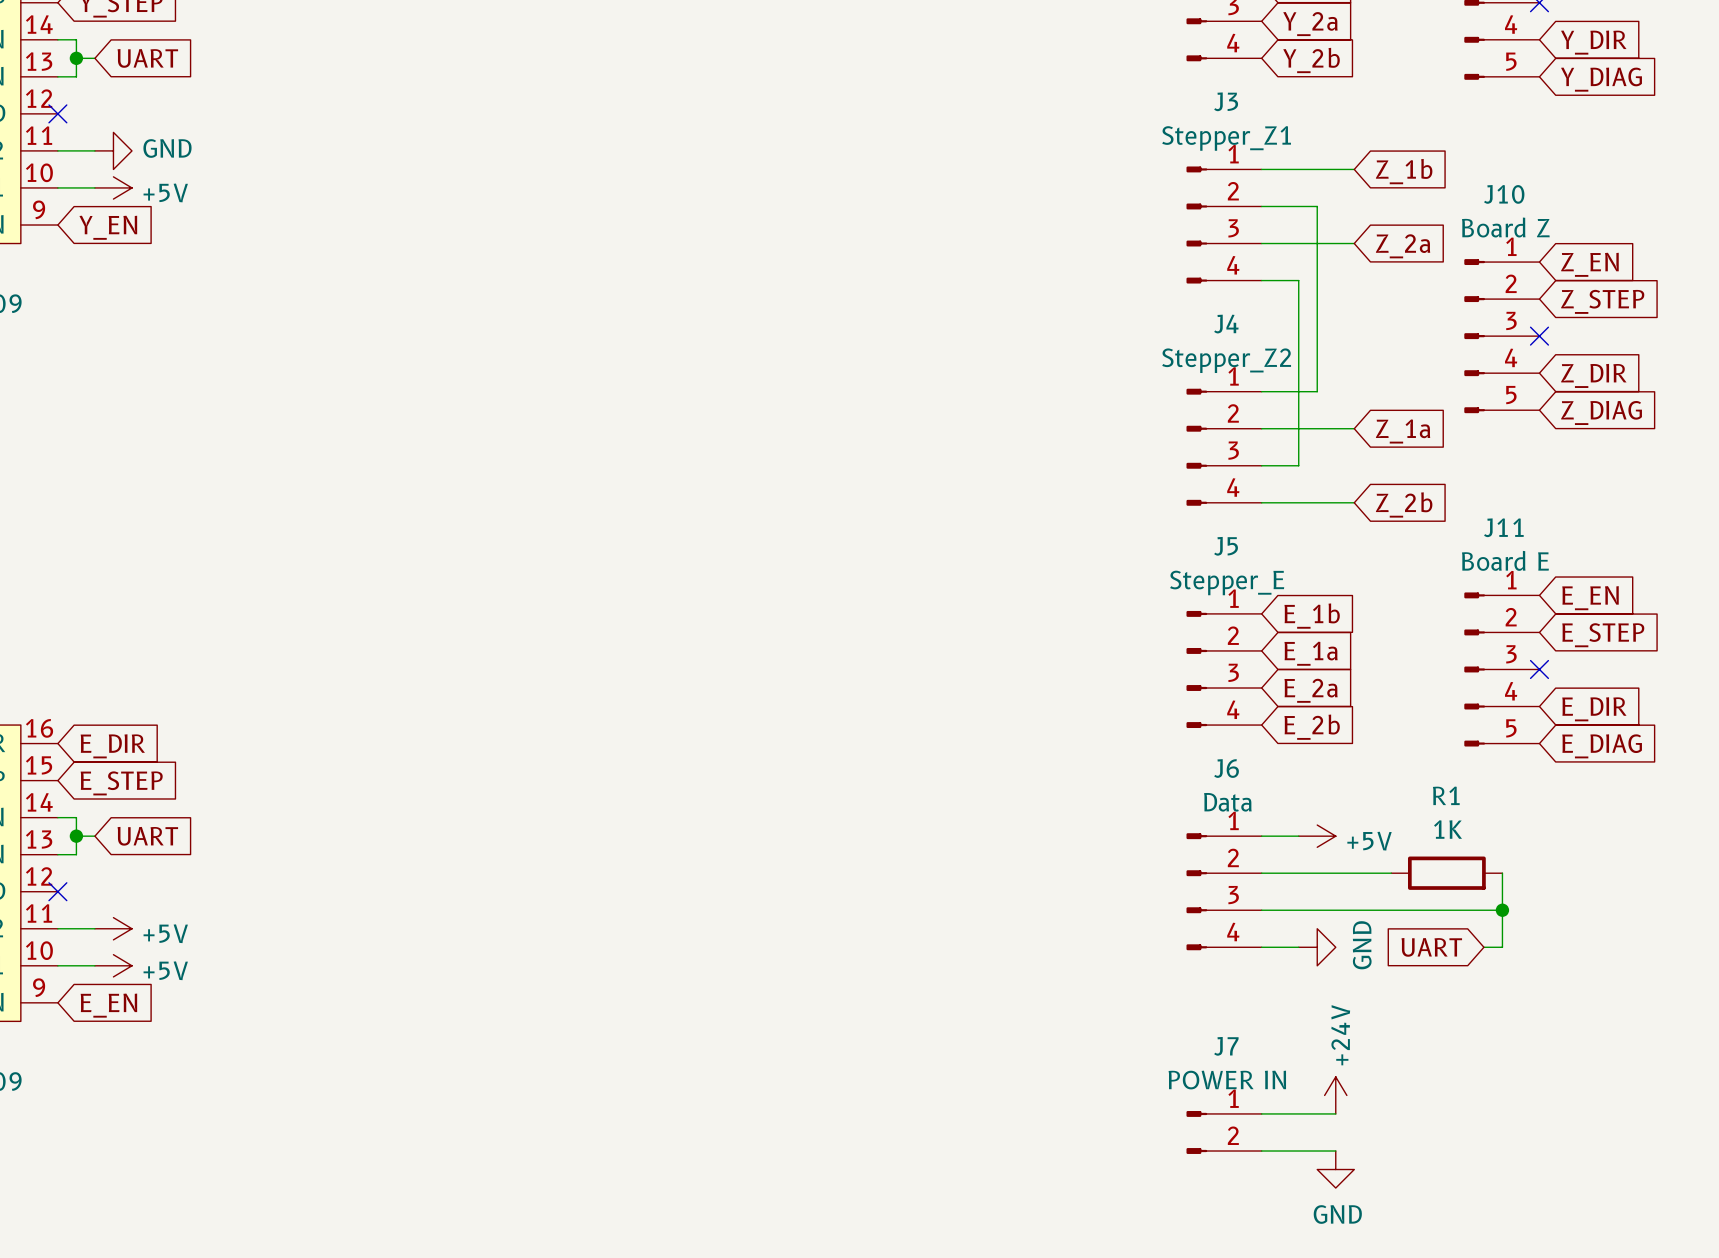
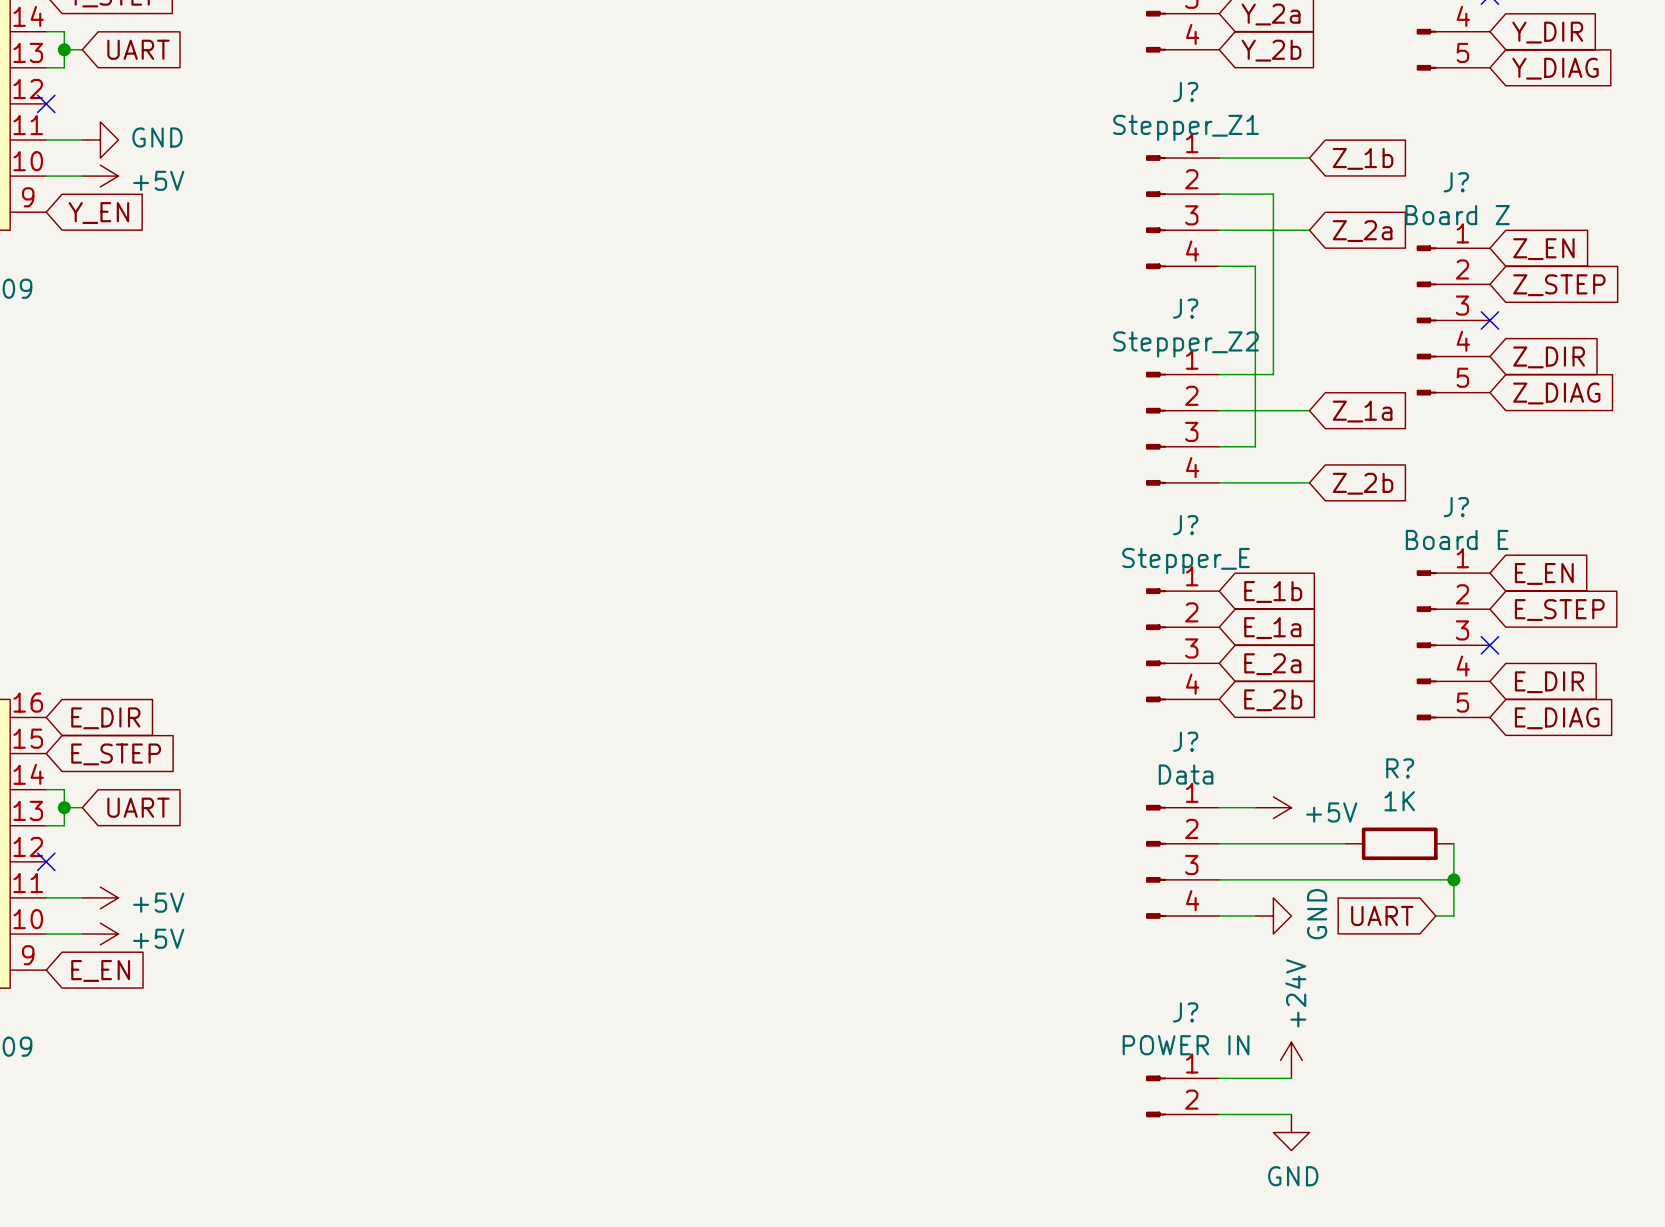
J3 name: J3 (1226, 101) -> J? (1185, 92)
J10 name: J10 (1504, 194) -> J? (1456, 182)
J4 name: J4 (1226, 324) -> J? (1185, 308)
J11 name: J11 (1503, 527) -> J? (1456, 507)
J5 name: J5 (1226, 546) -> J? (1185, 525)
J6 name: J6 (1226, 768) -> J? (1185, 741)
R1 name: R1 (1446, 795) -> R? (1400, 768)
J7 name: J7 (1226, 1046) -> J? (1185, 1012)

